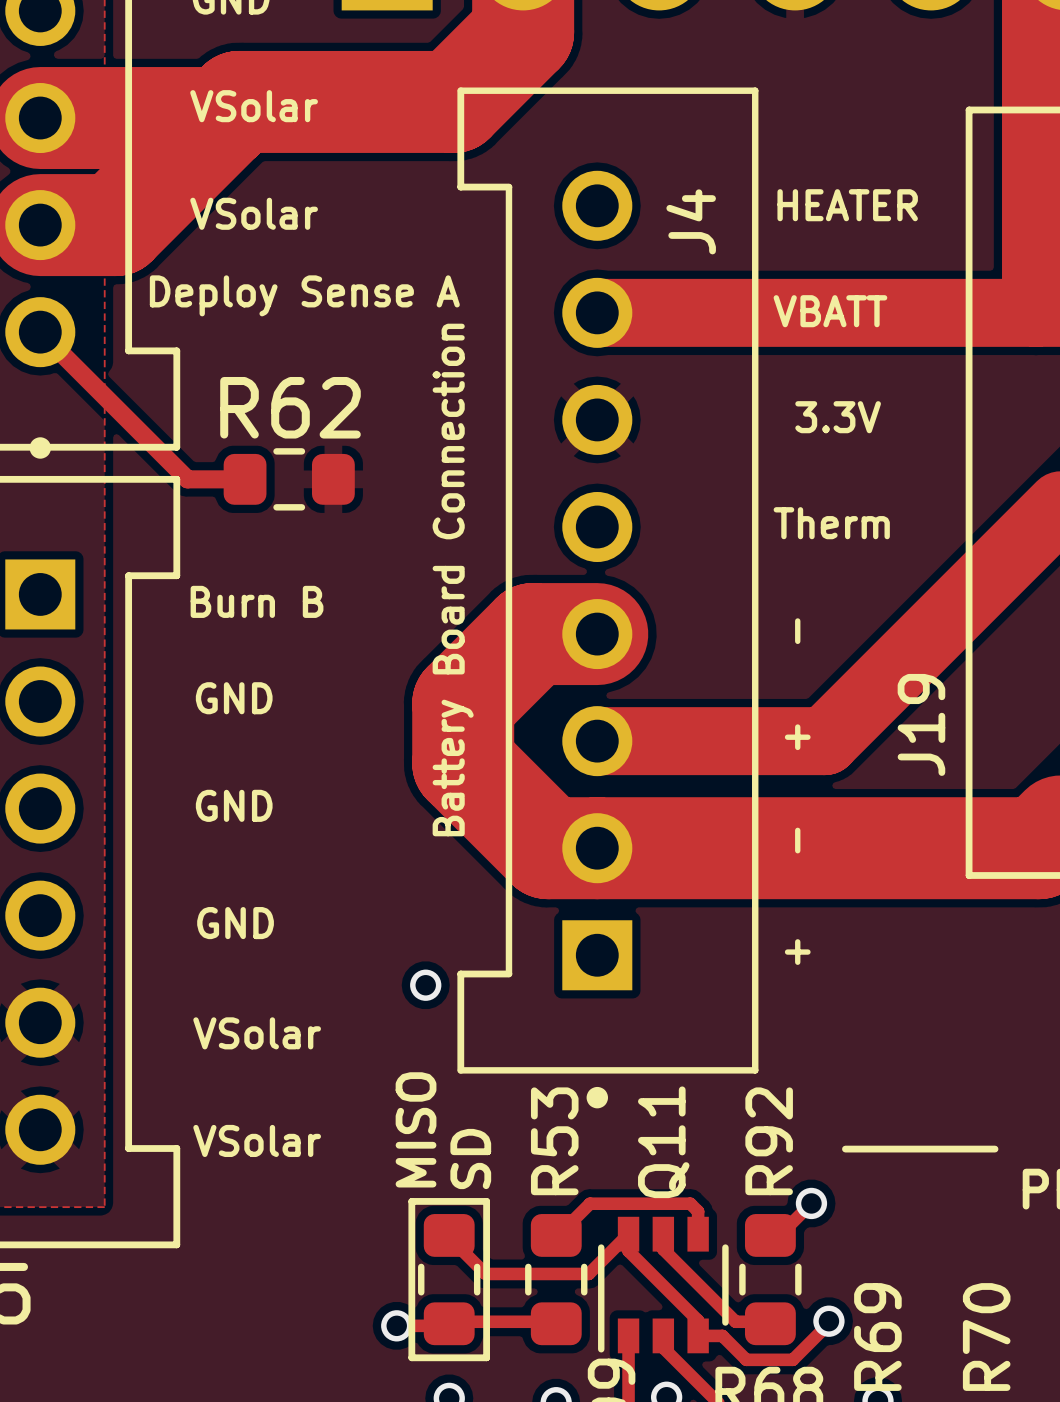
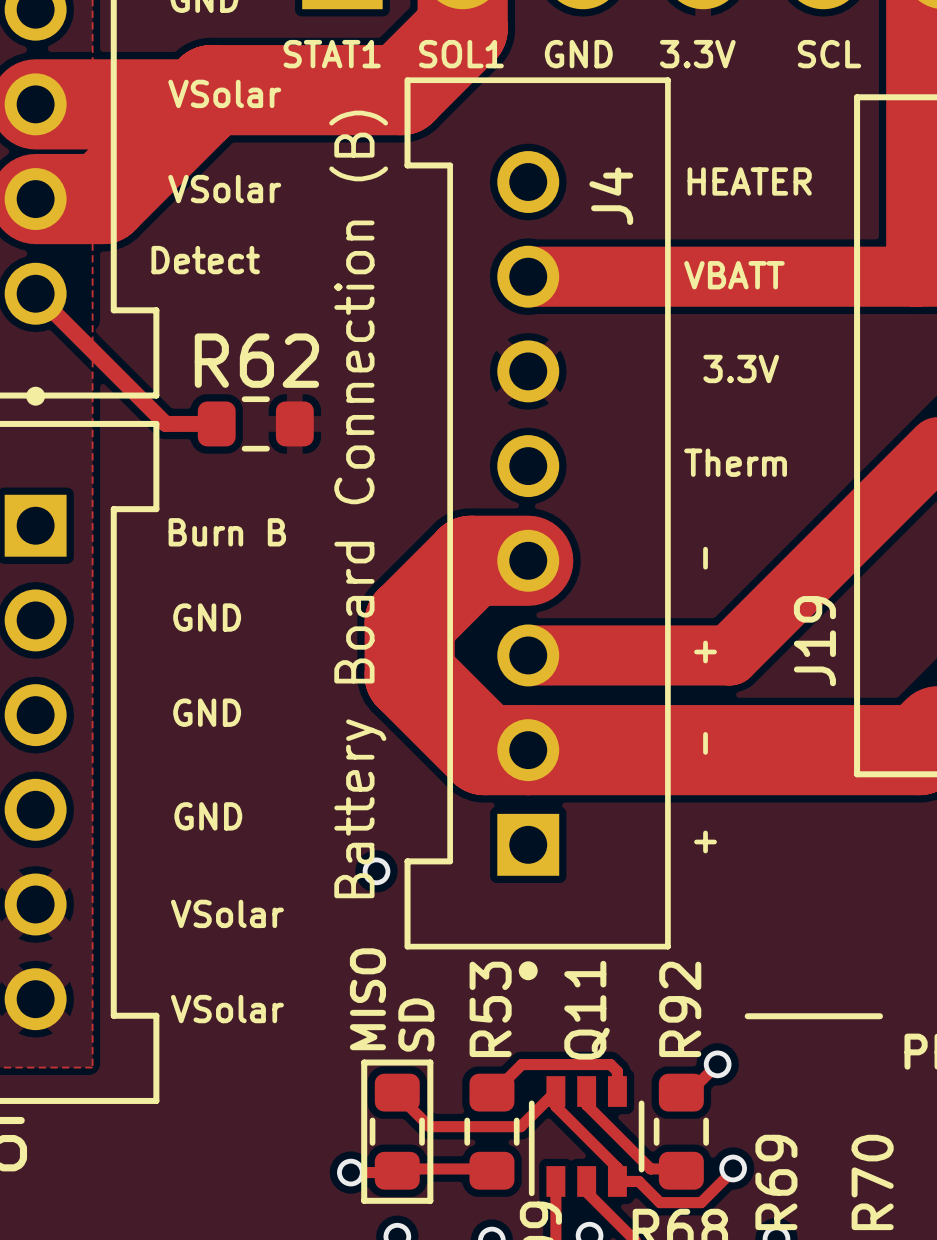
text: none -> STAT1 (332, 54)
text: none -> SOL1 (461, 54)
text: none -> GND (578, 54)
text: none -> 3.3V (697, 54)
text: none -> SCL (829, 54)
text: none -> Detect (205, 260)
text: Deploy Sense A (304, 295) -> none
text: Battery Board Connection (453, 579) -> Battery Board Connection (B) (358, 504)

